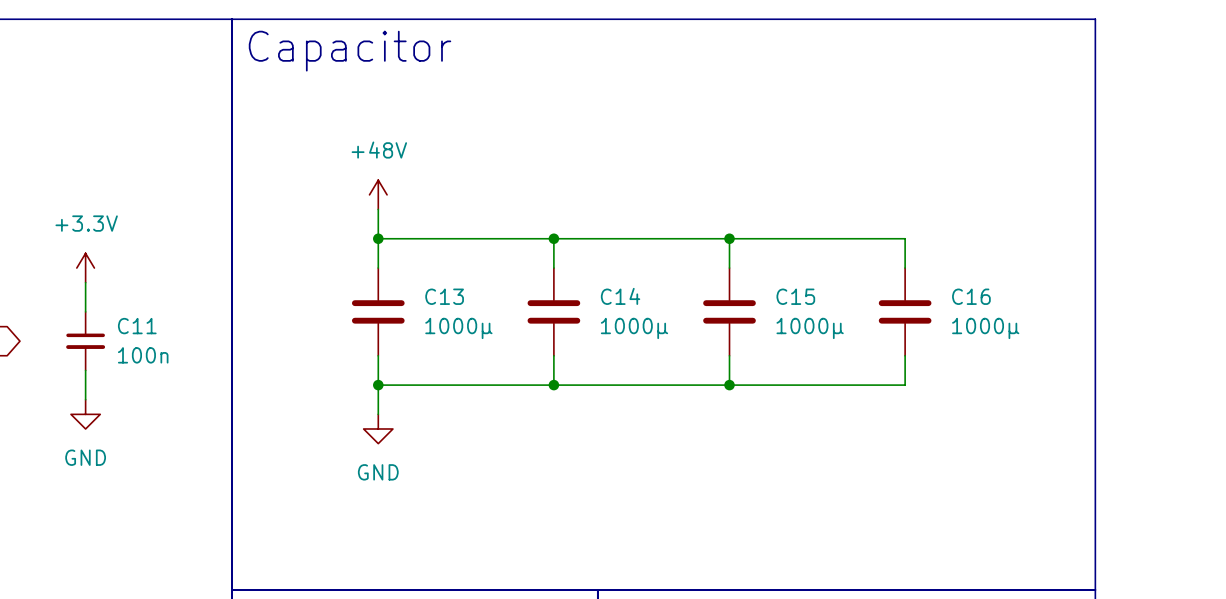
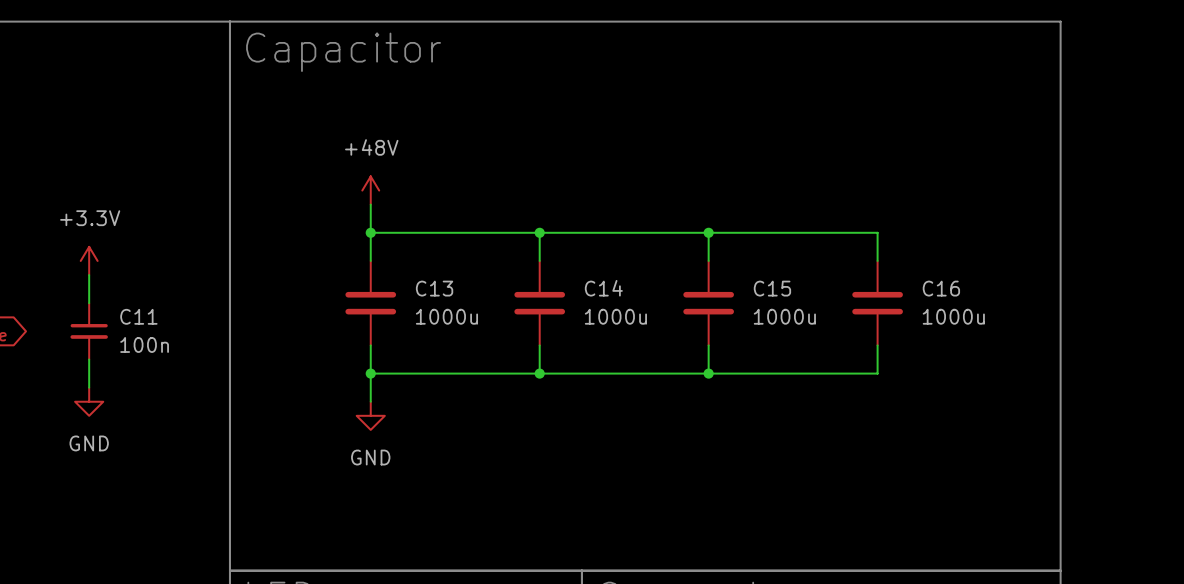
C13 value: 1000μ (458, 328) -> 1000u (446, 316)
C14 value: 1000μ (634, 328) -> 1000u (615, 316)
C15 value: 1000μ (810, 328) -> 1000u (784, 316)
C16 value: 1000μ (985, 328) -> 1000u (953, 316)

